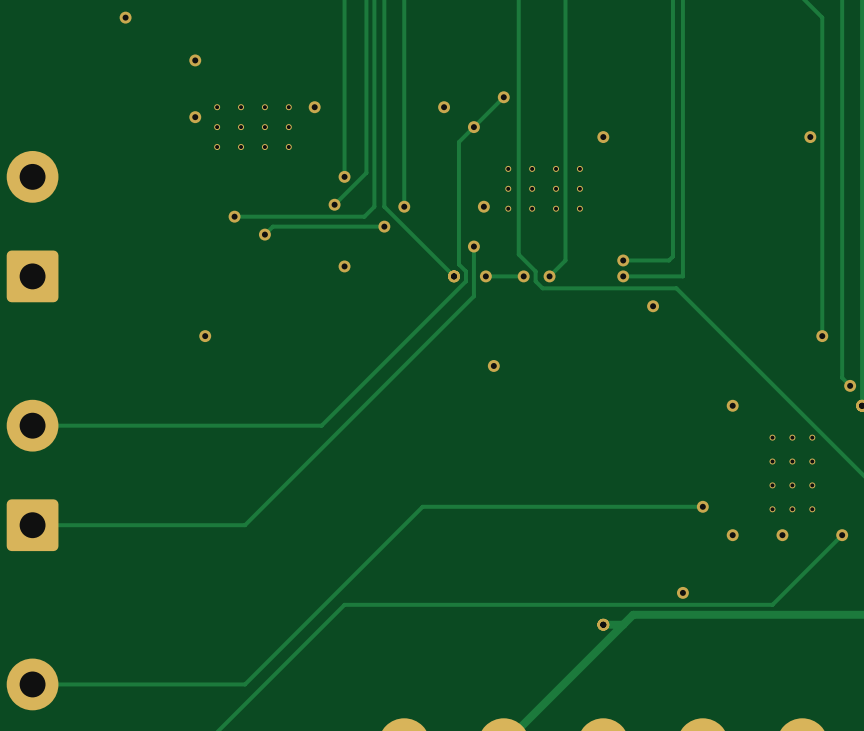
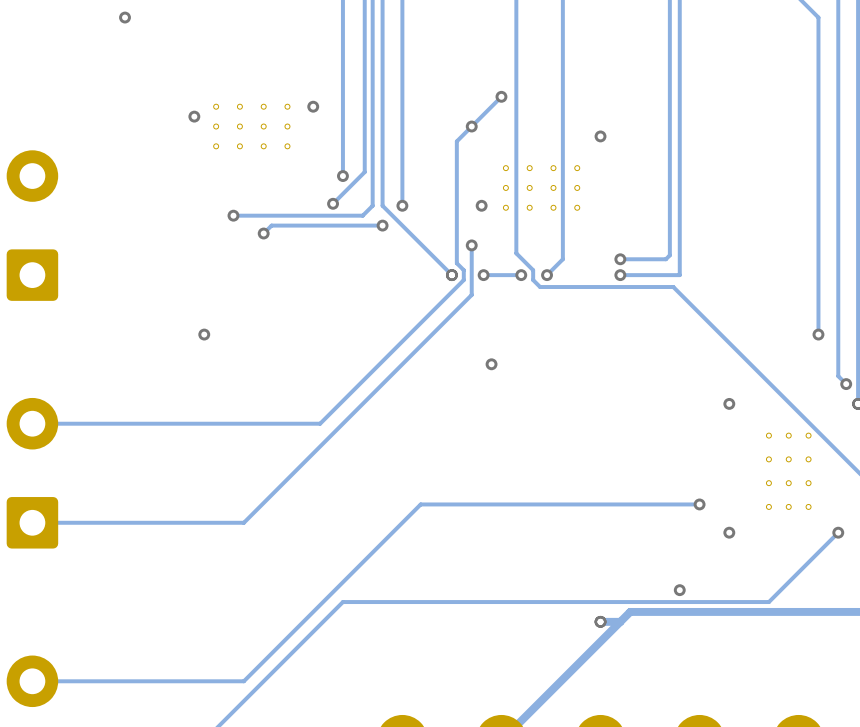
via: (195, 60) -> none
via: (444, 107) -> none
via: (810, 137) -> none
via: (344, 266) -> none
via: (653, 306) -> none
via: (782, 535) -> none

